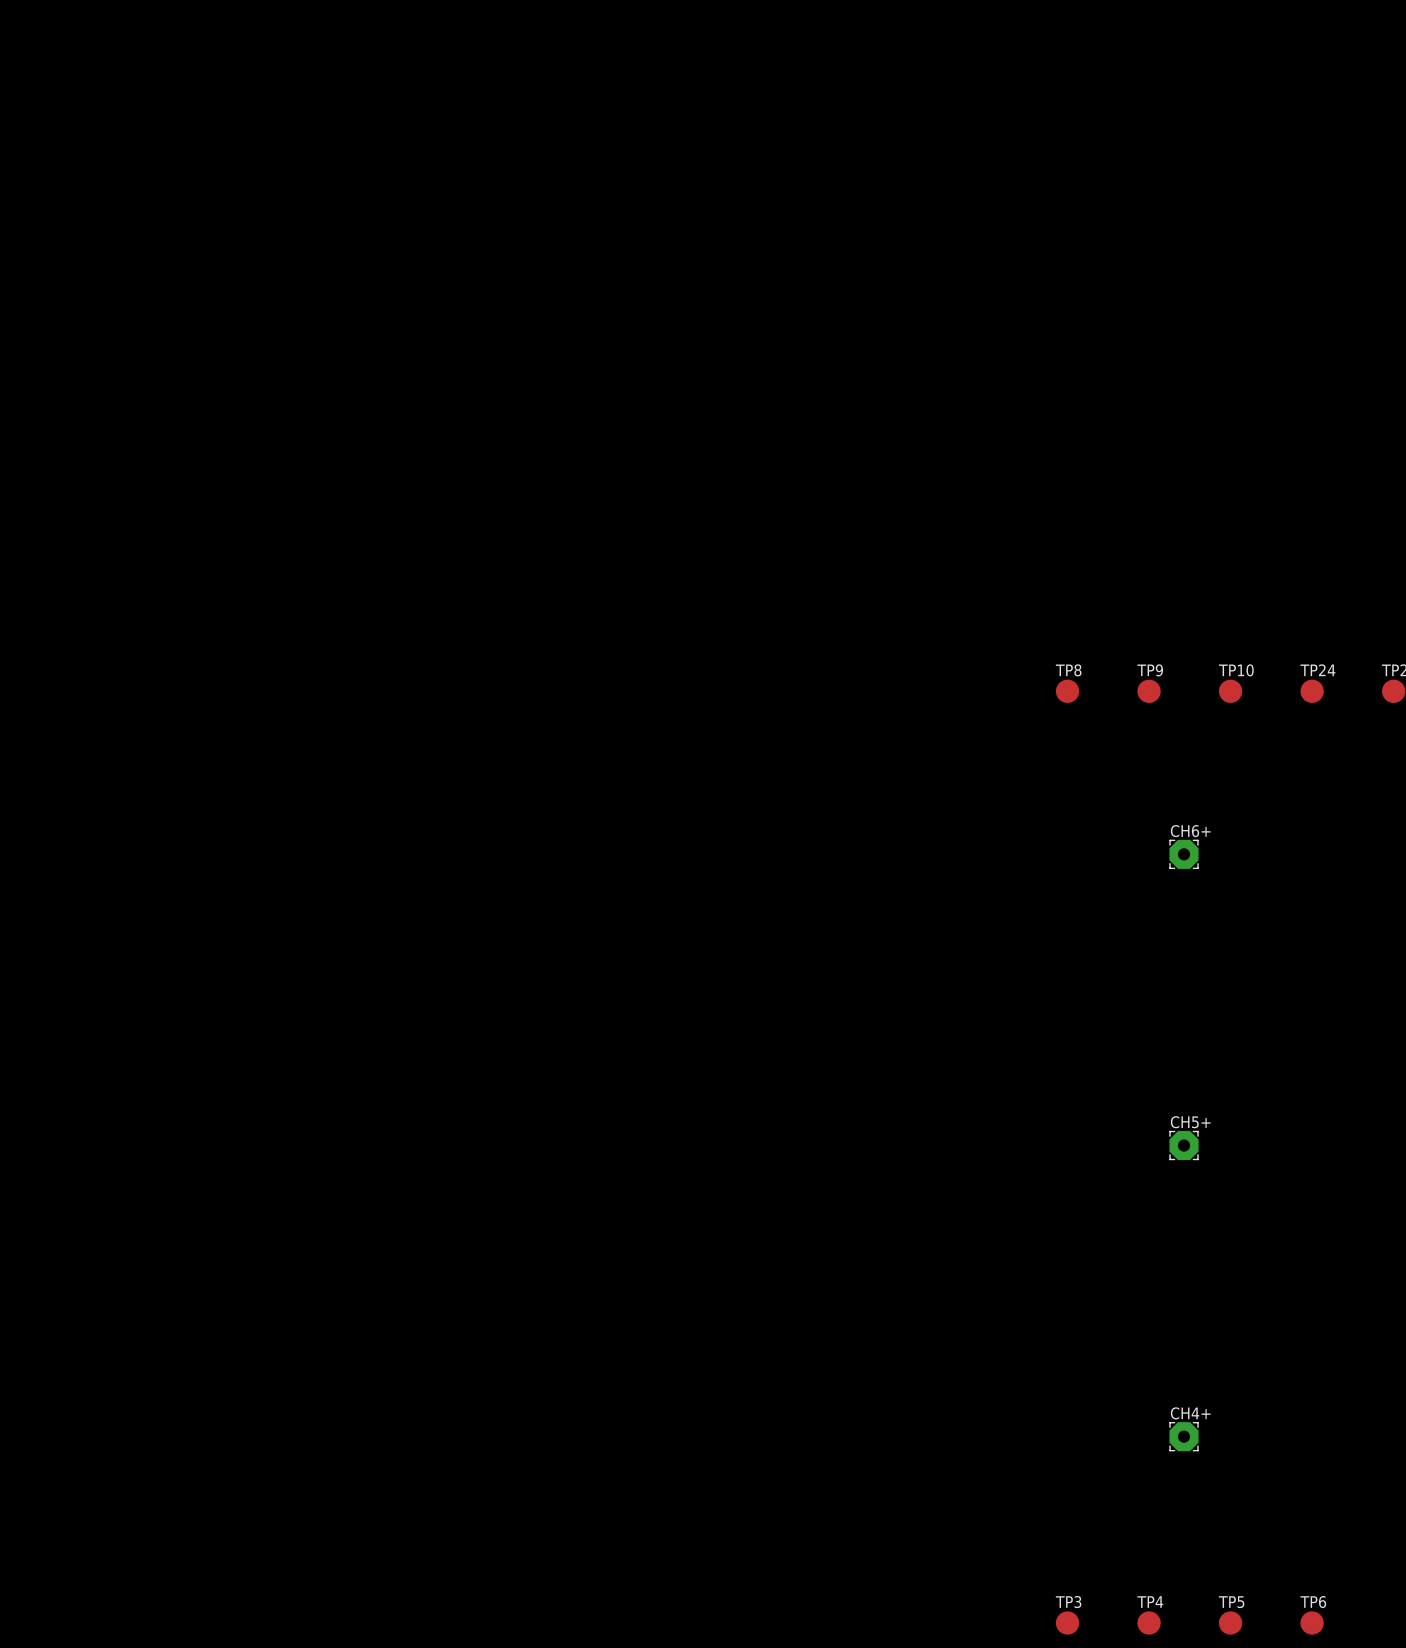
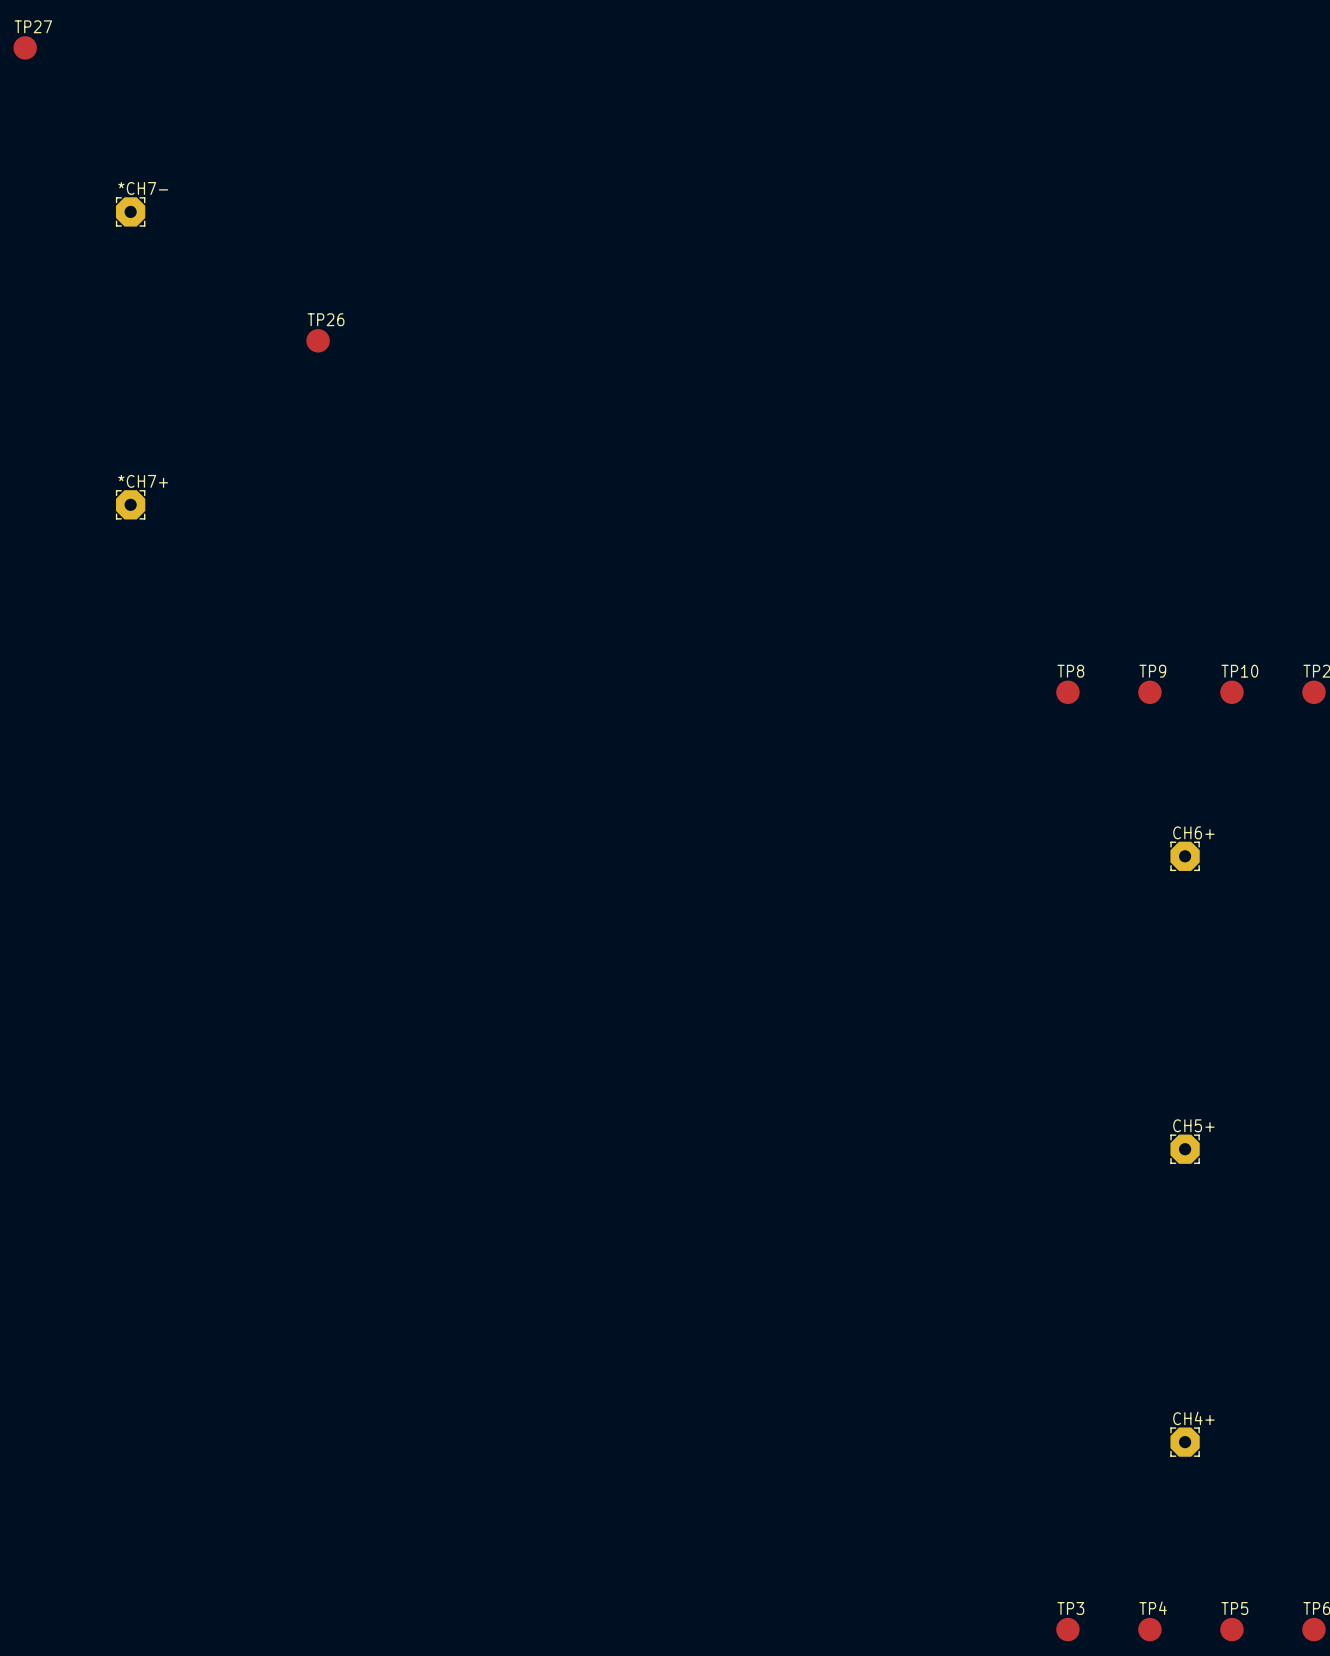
TP27: none -> (25, 47)
*CH7-: none -> (130, 211)
TP26: none -> (318, 340)
*CH7+: none -> (130, 504)

